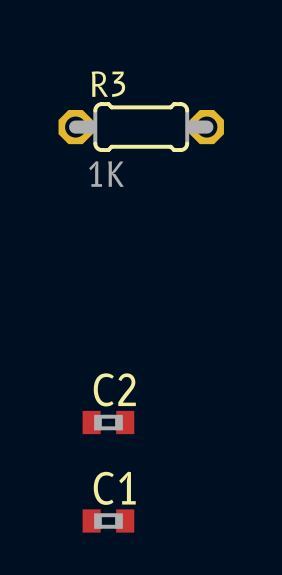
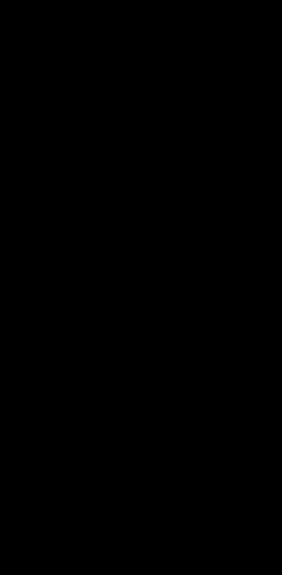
R3: 1K (141, 127) -> none
C2: (108, 422) -> none
C1: (108, 520) -> none

